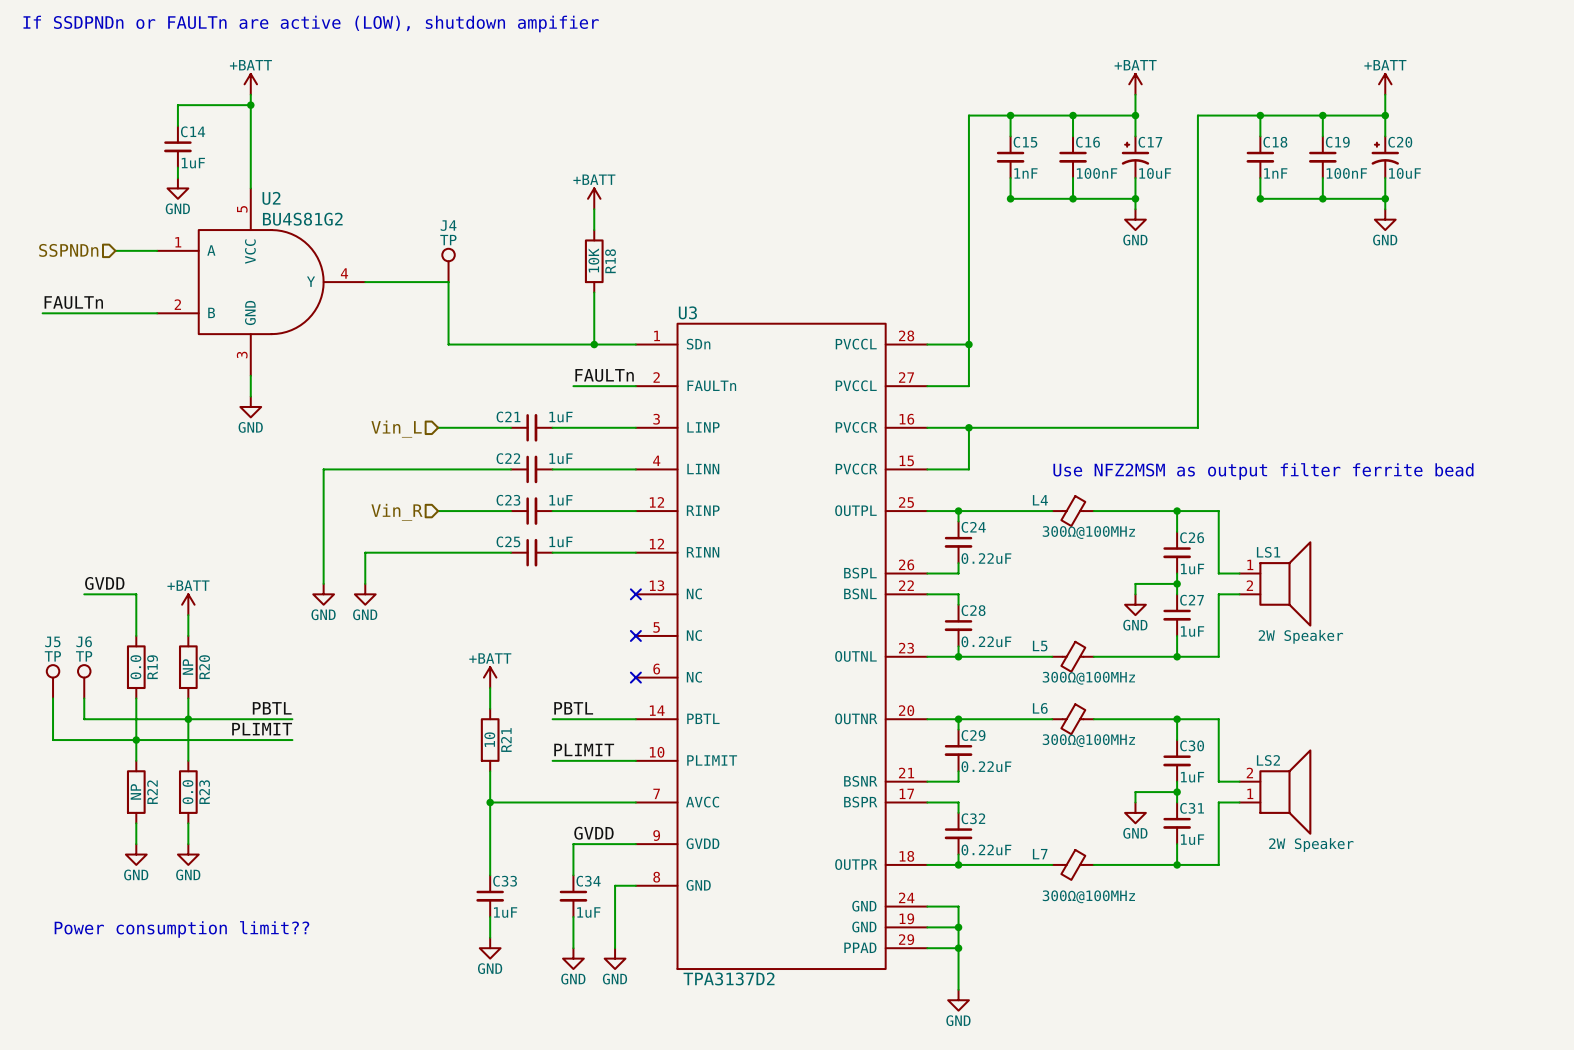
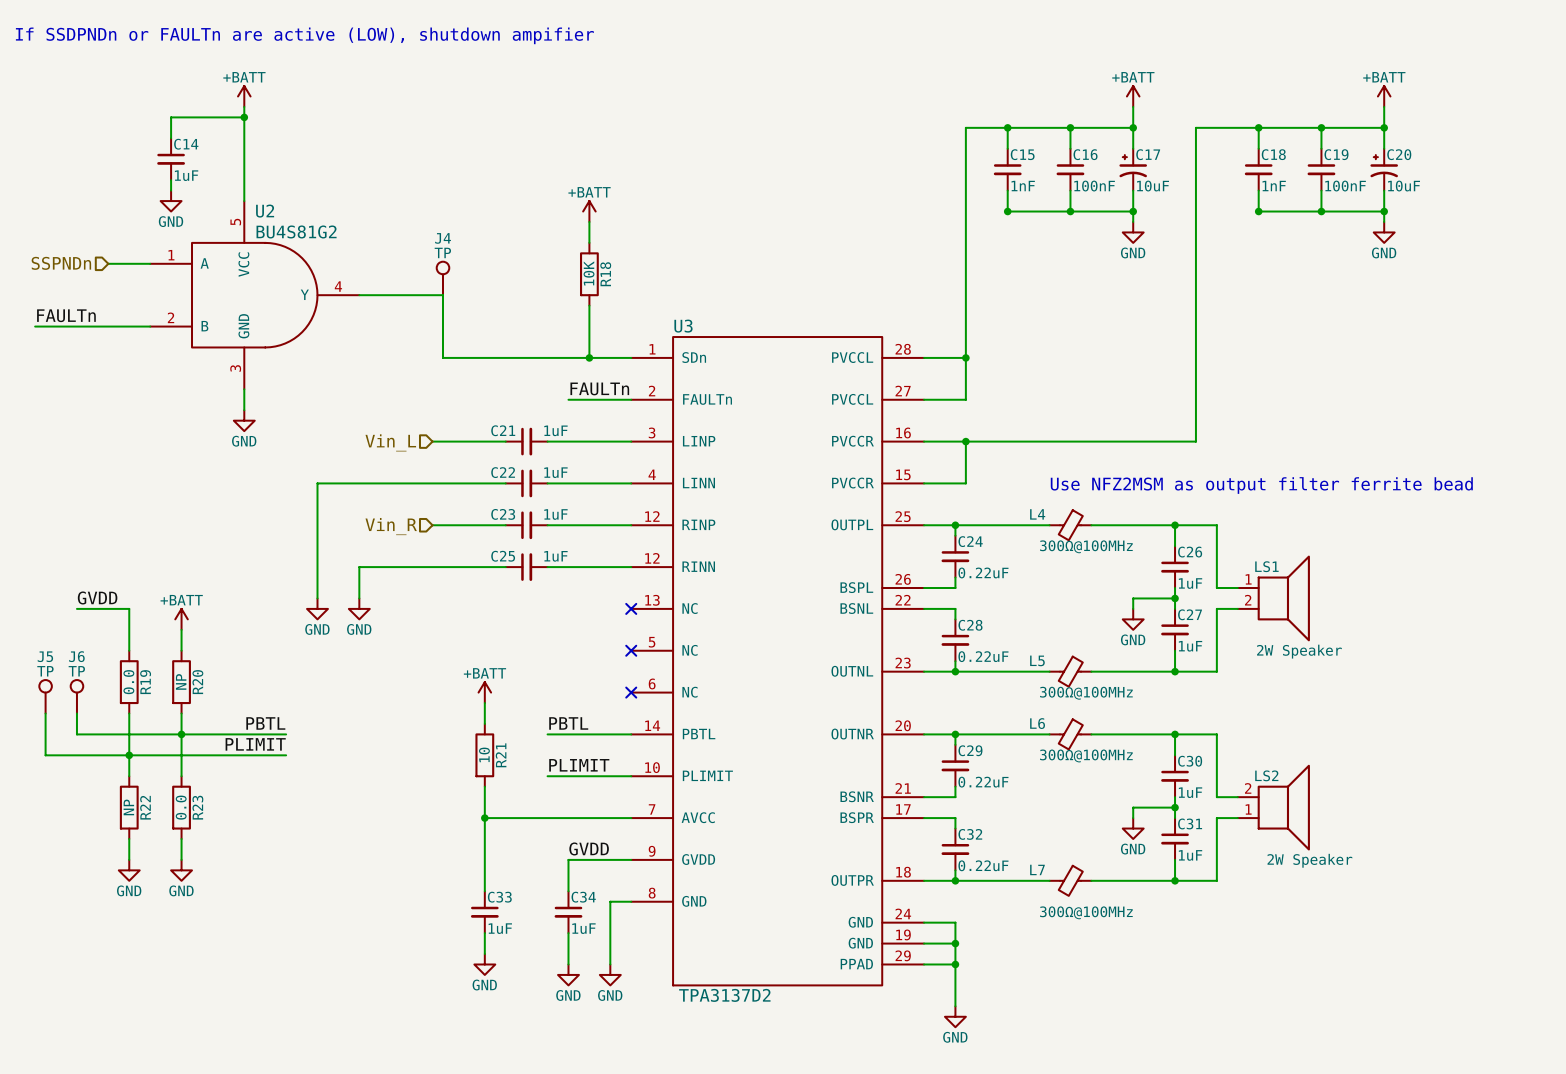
text: Power consumption limit?? (181, 929) -> none

